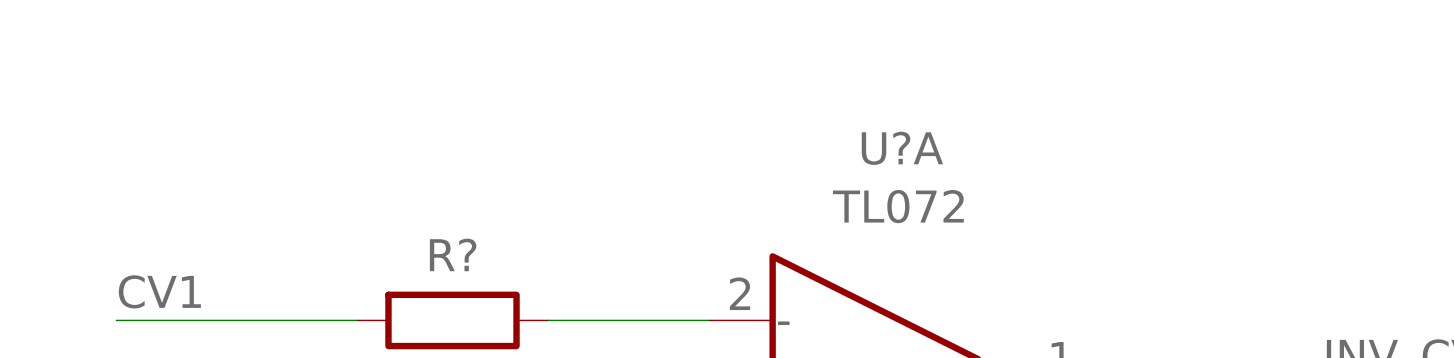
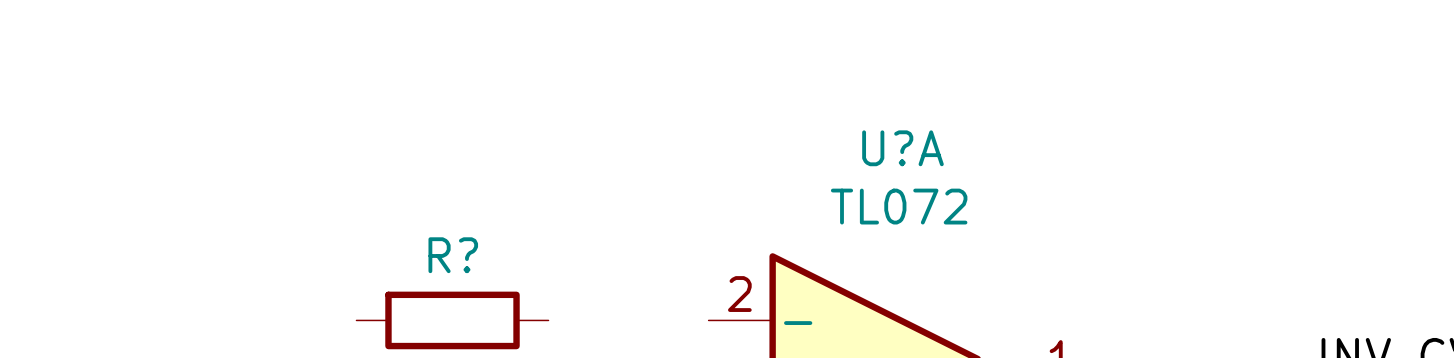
label: CV1 (159, 291) -> none
wire: (116, 320) (356, 320) -> none
wire: (548, 320) (708, 320) -> none

